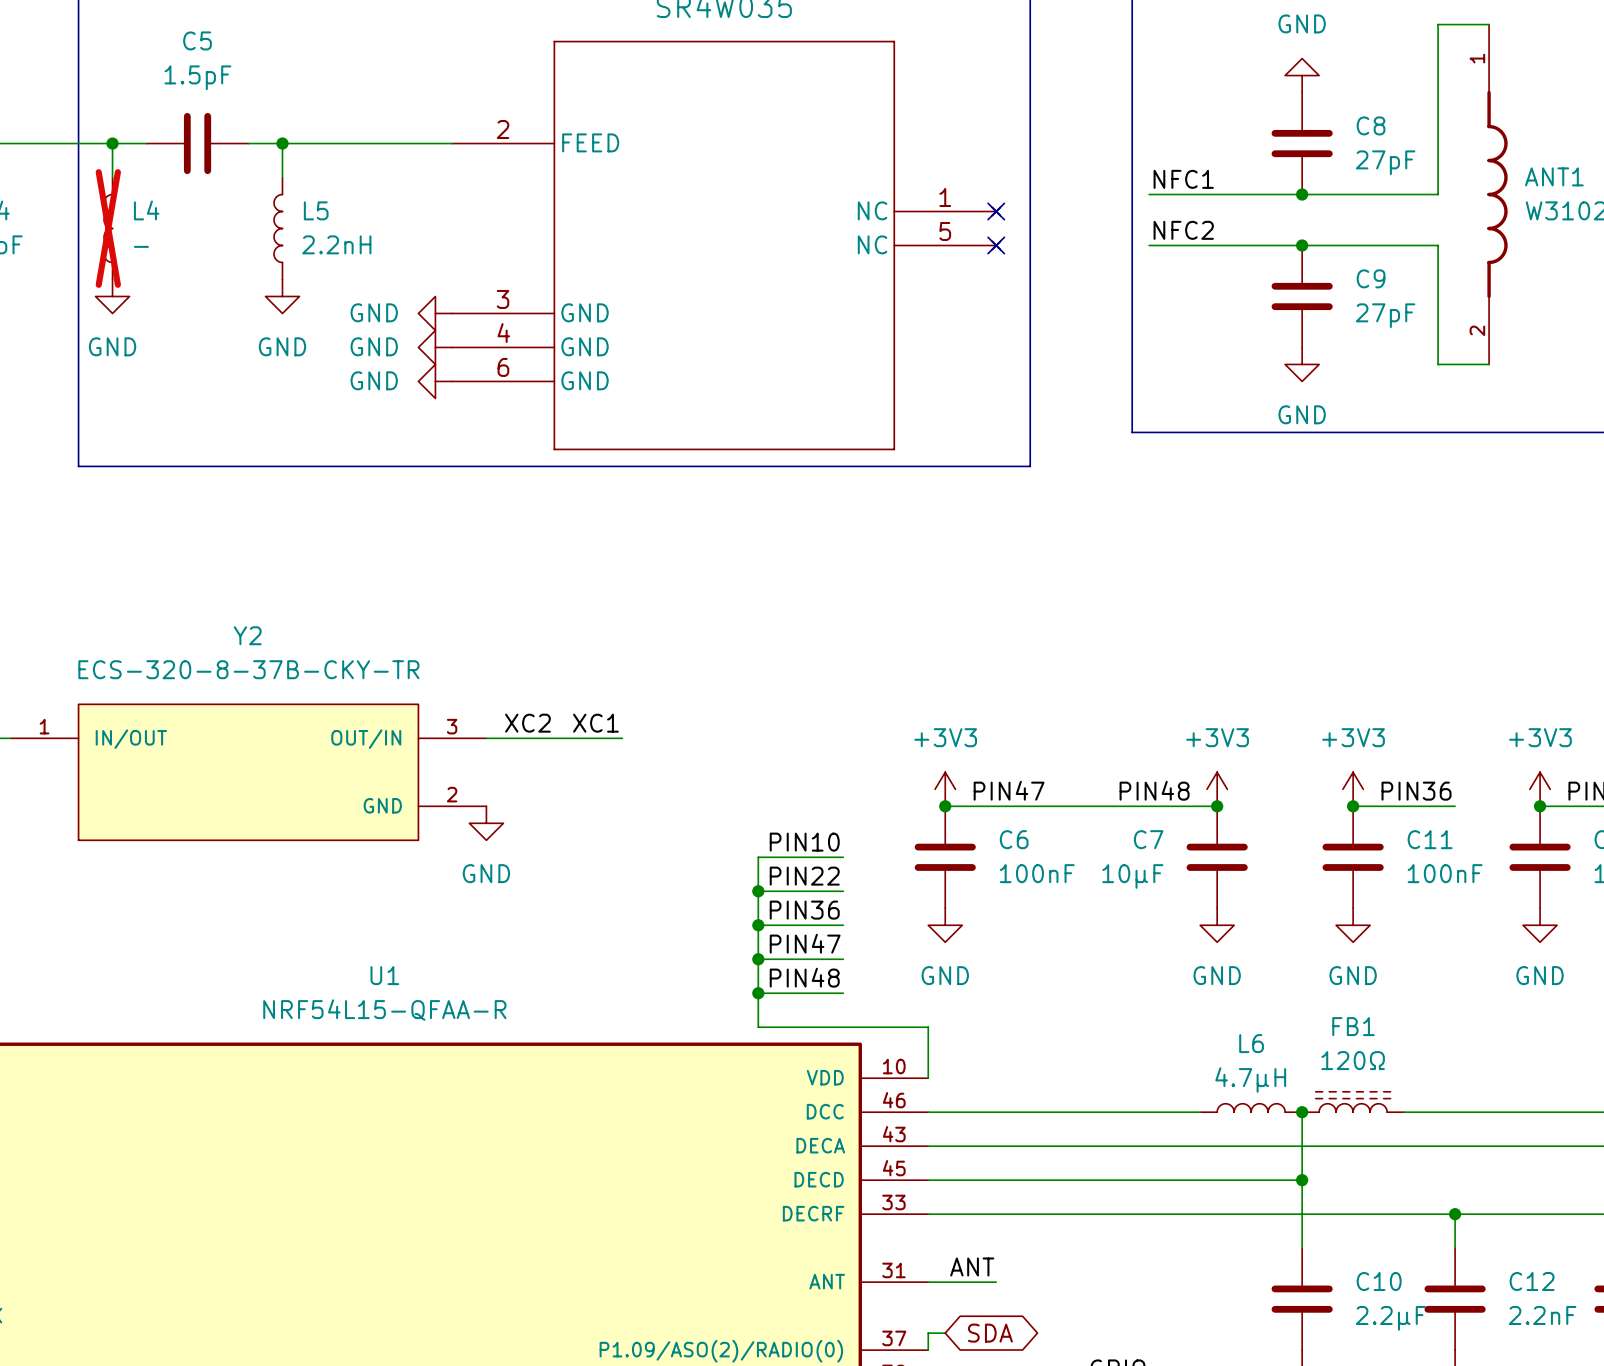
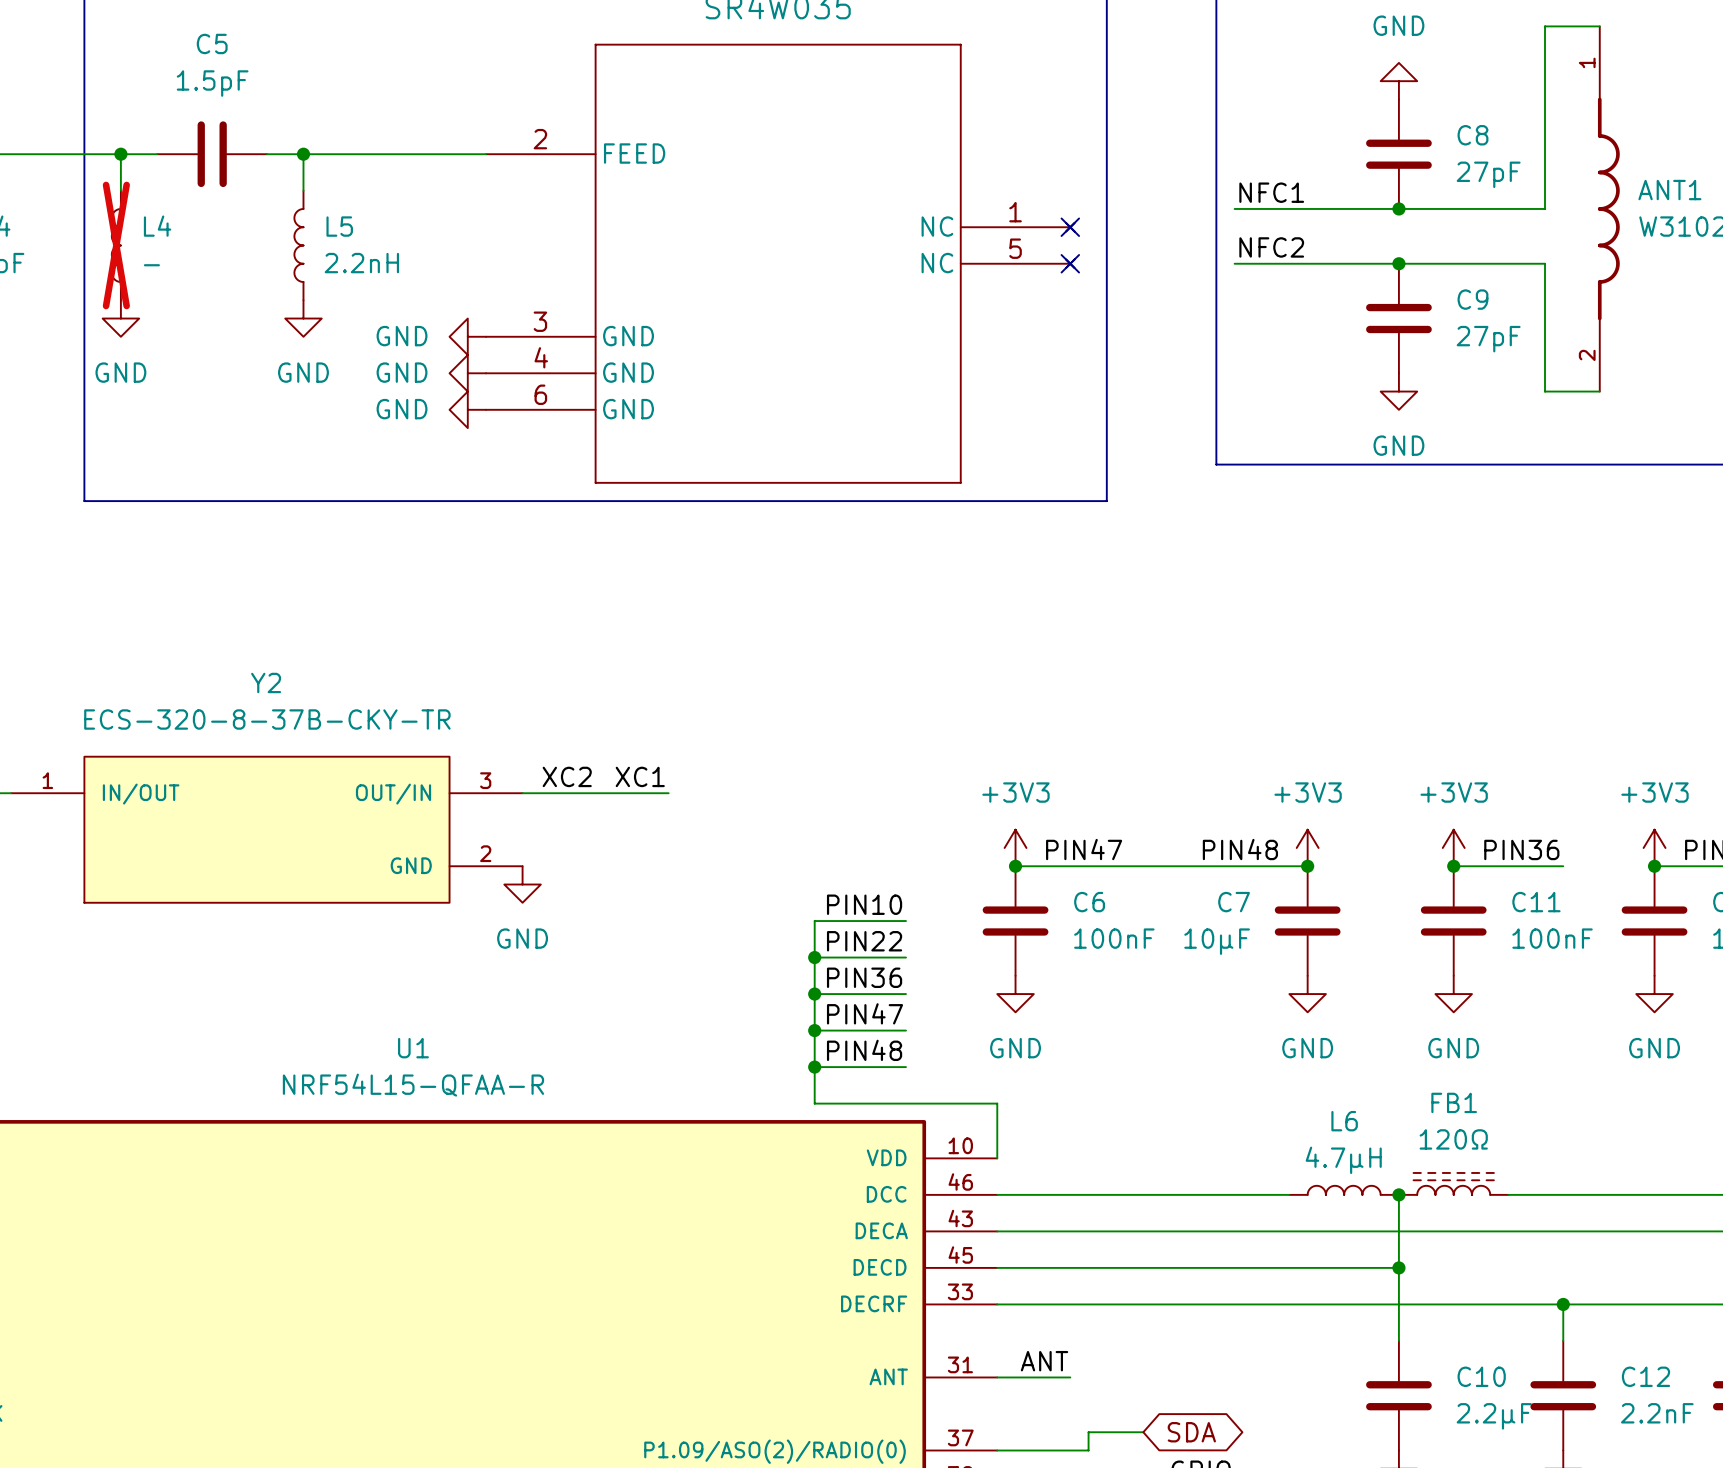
wire: (945, 1333) (928, 1333) (928, 1350) -> (1143, 1432) (1088, 1432) (1088, 1450) (997, 1450)
global label position: SDA (990, 1333) -> SDA (1191, 1432)

